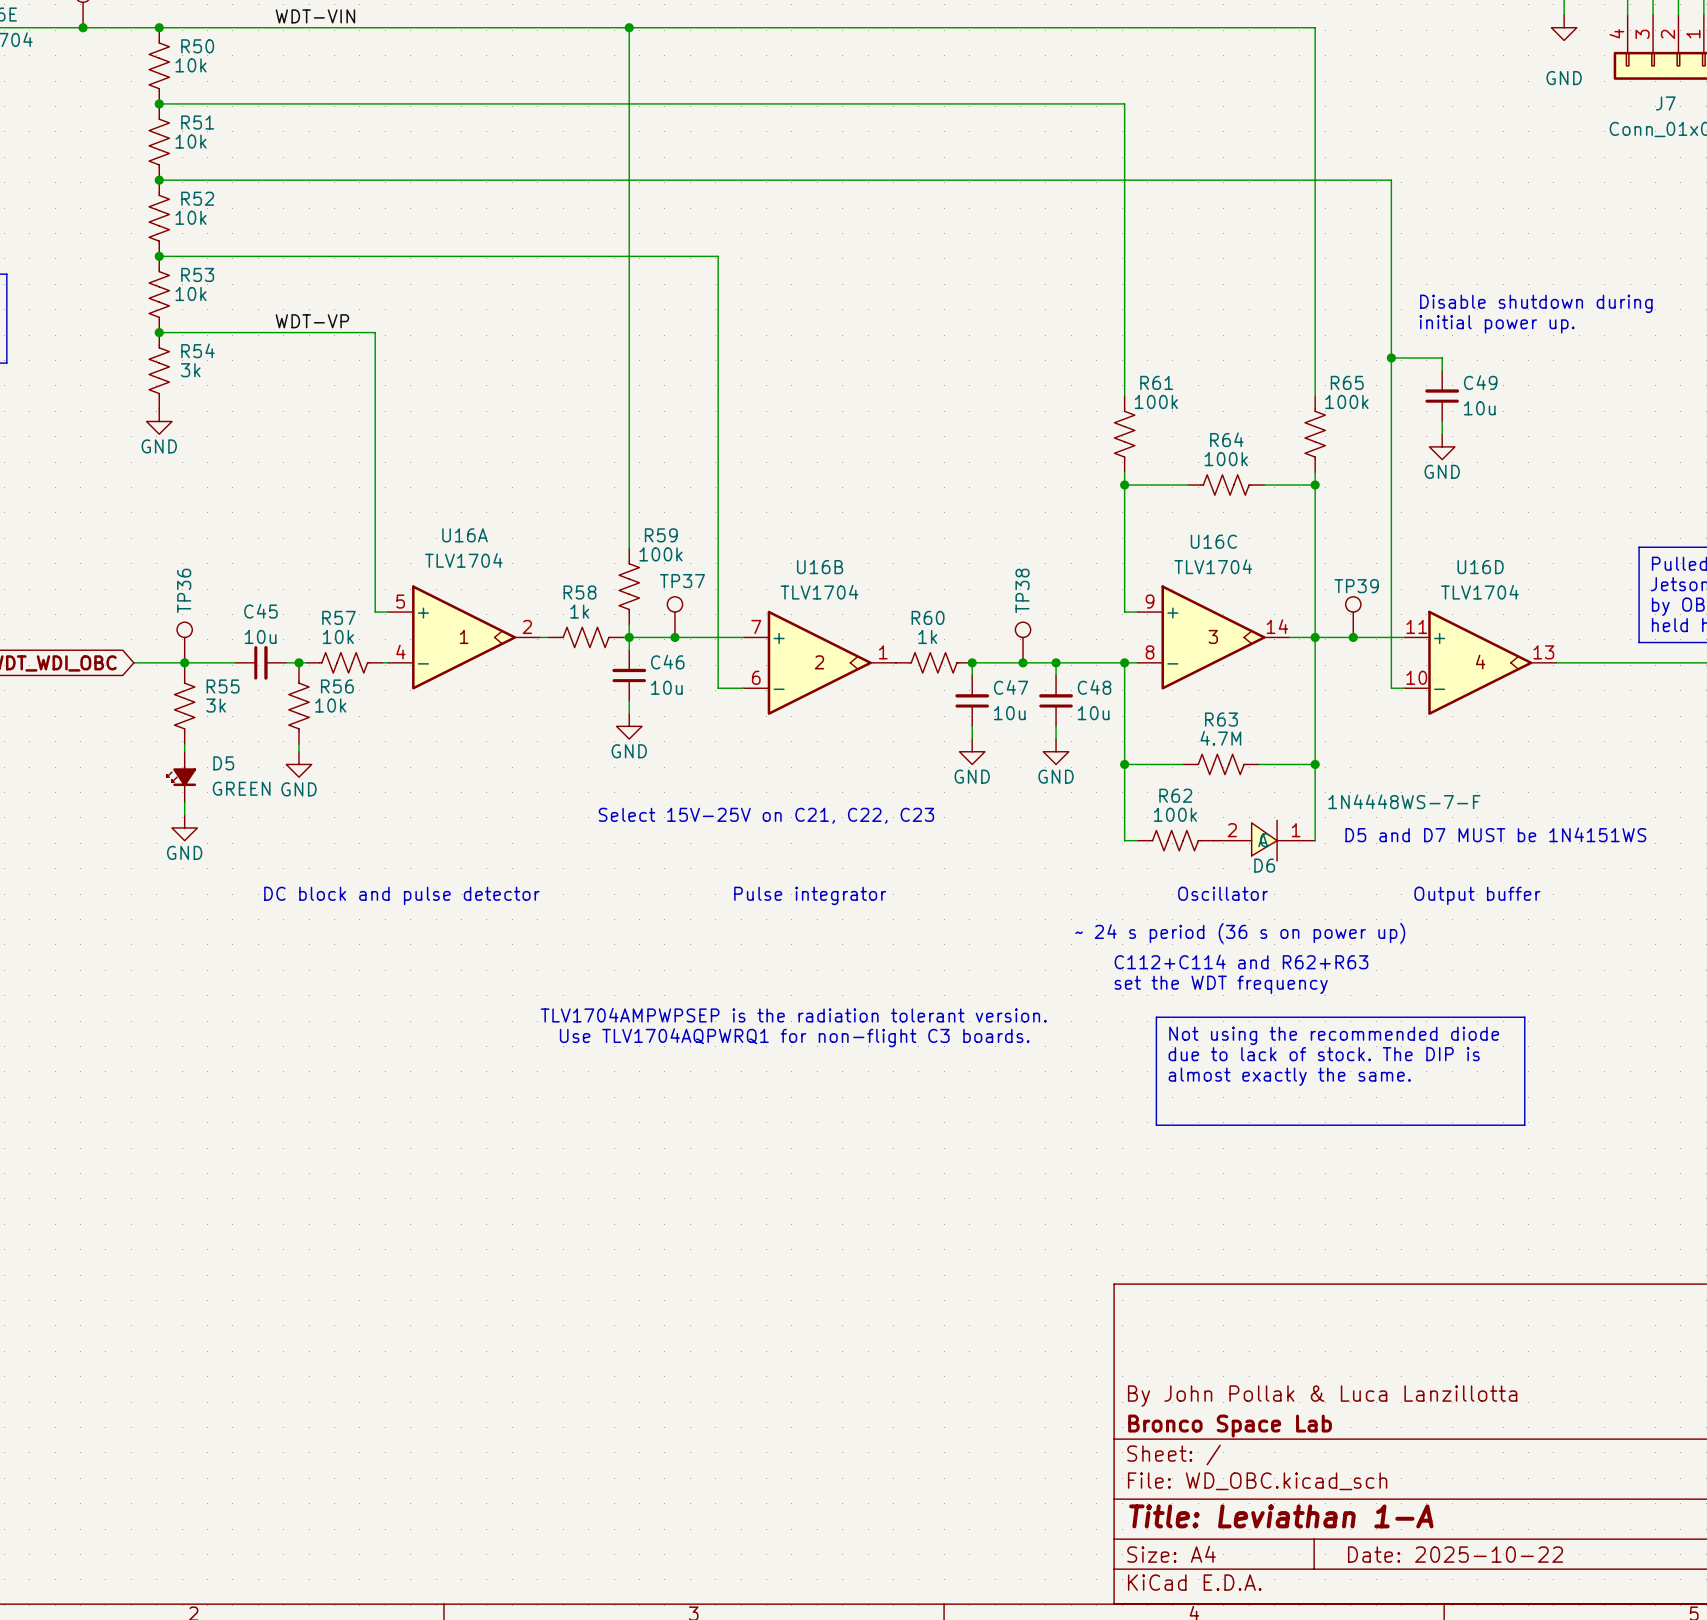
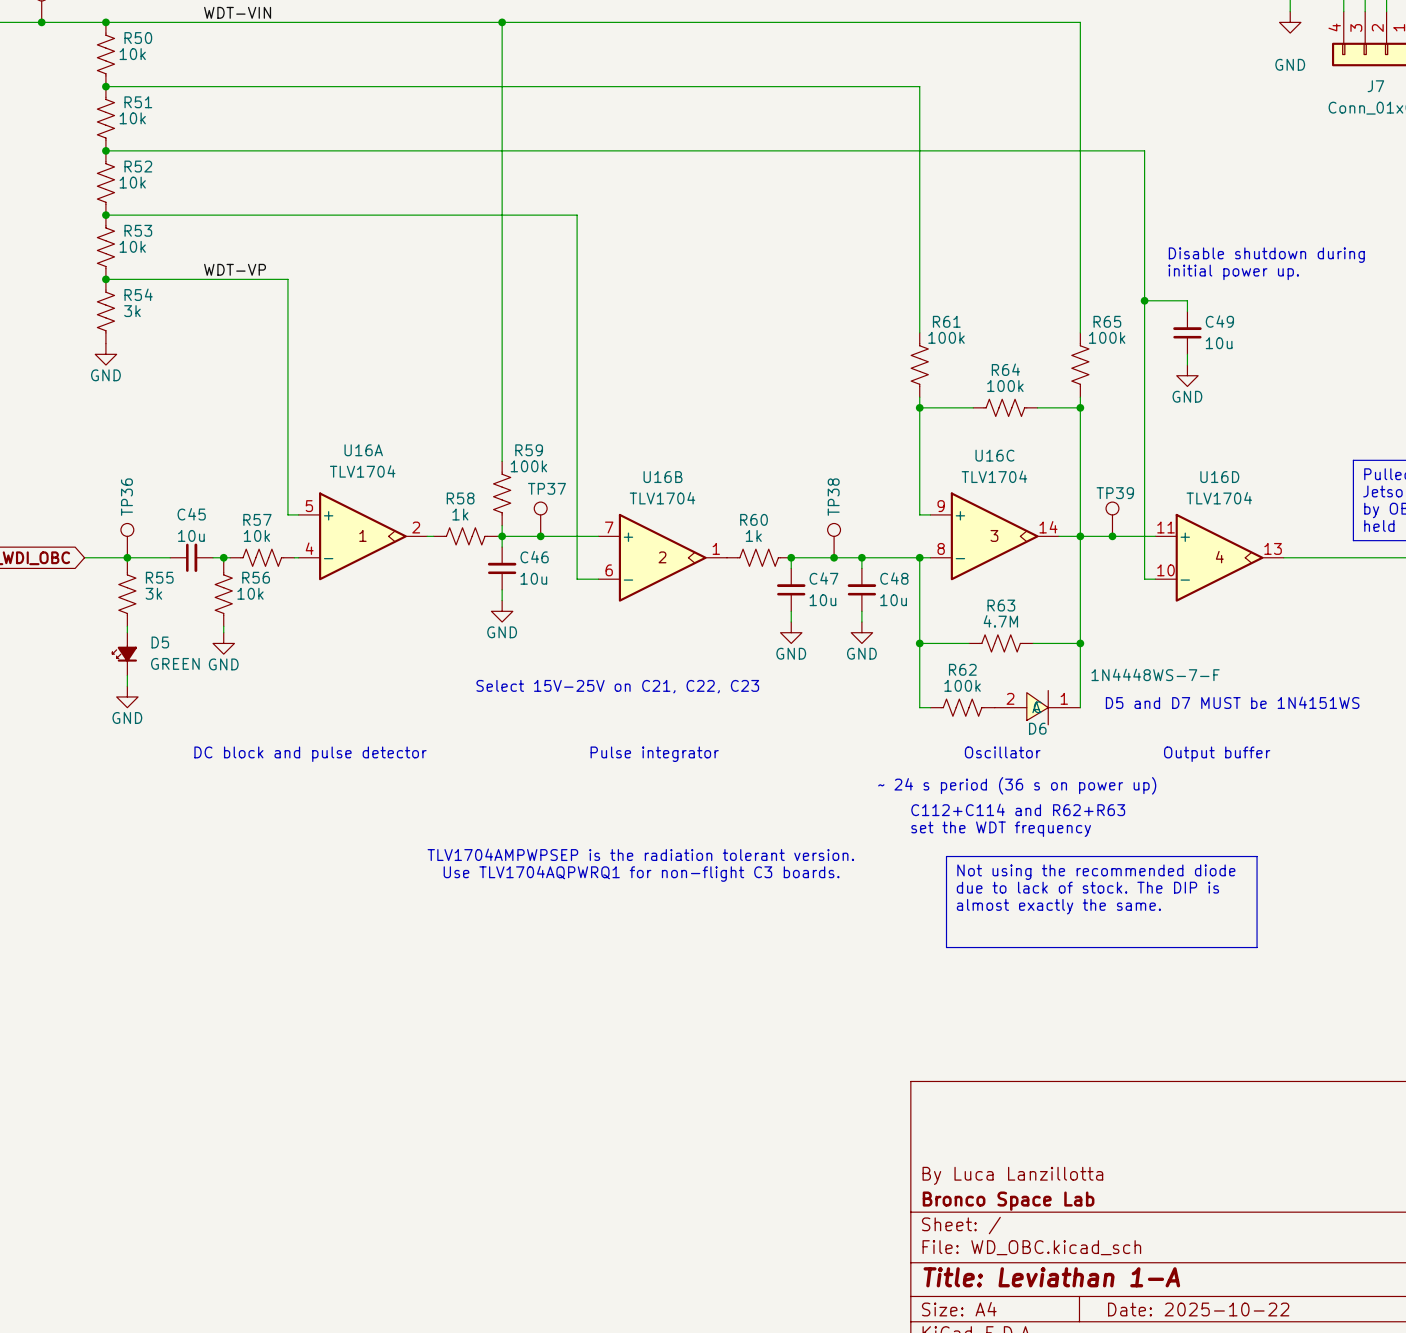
title block: By John Pollak & Luca Lanzillotta (1322, 1396) -> By Luca Lanzillotta (1012, 1175)

